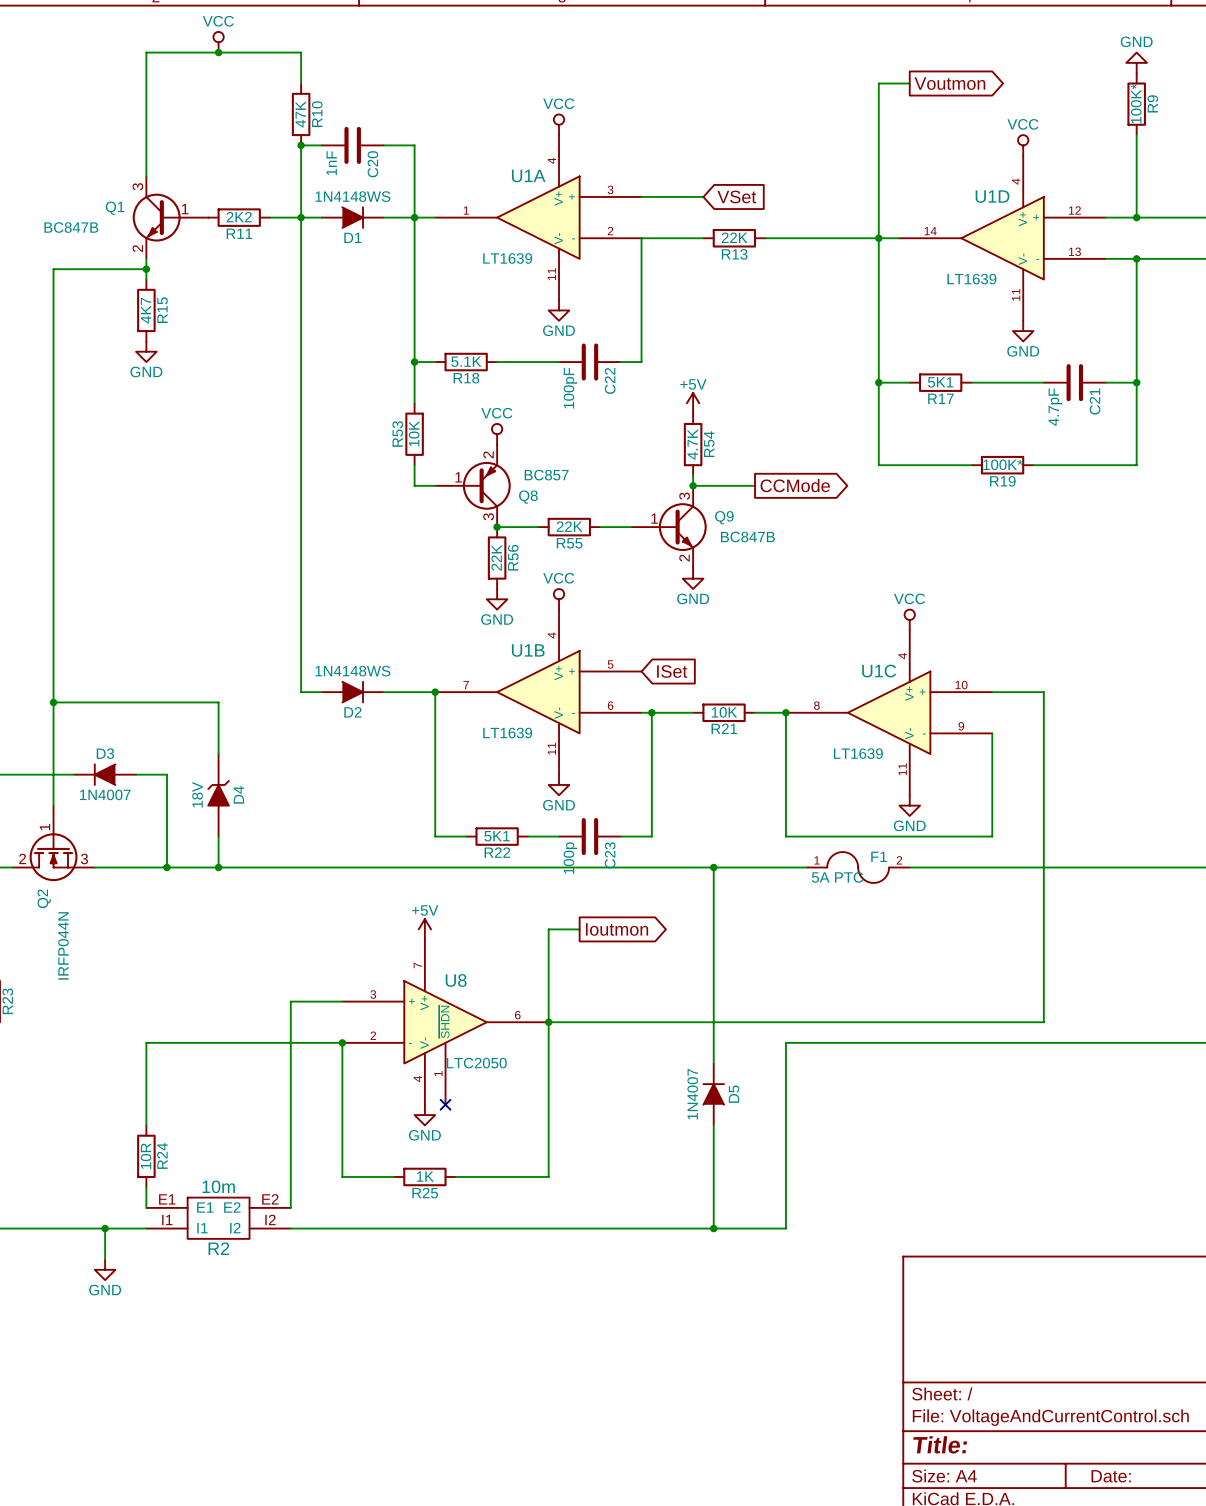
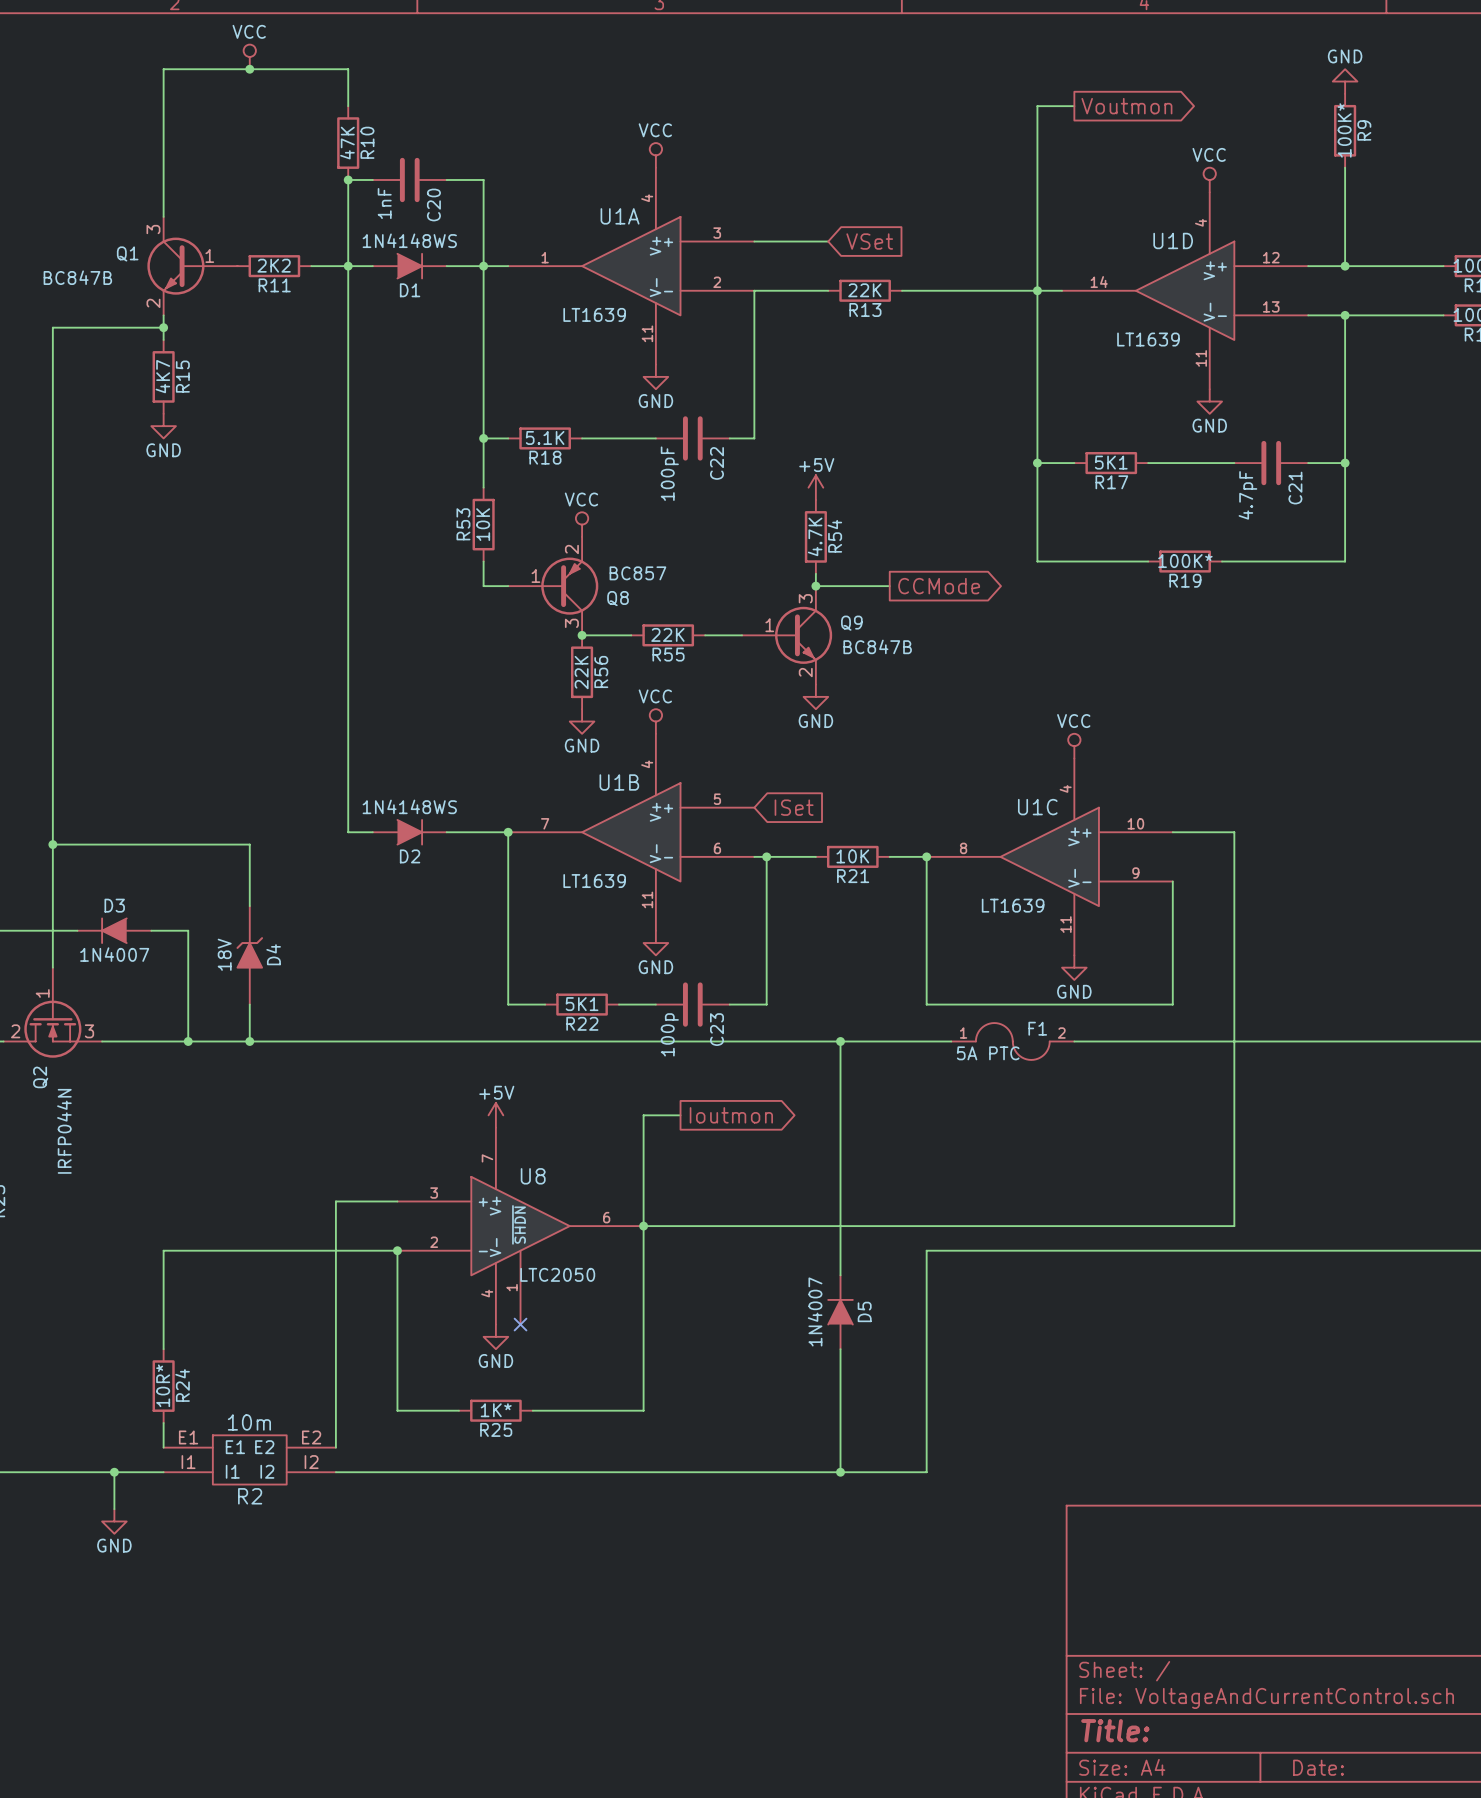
R24 value: 10R (145, 1156) -> 10R* (163, 1385)
R25 value: 1K (425, 1176) -> 1K* (496, 1410)

